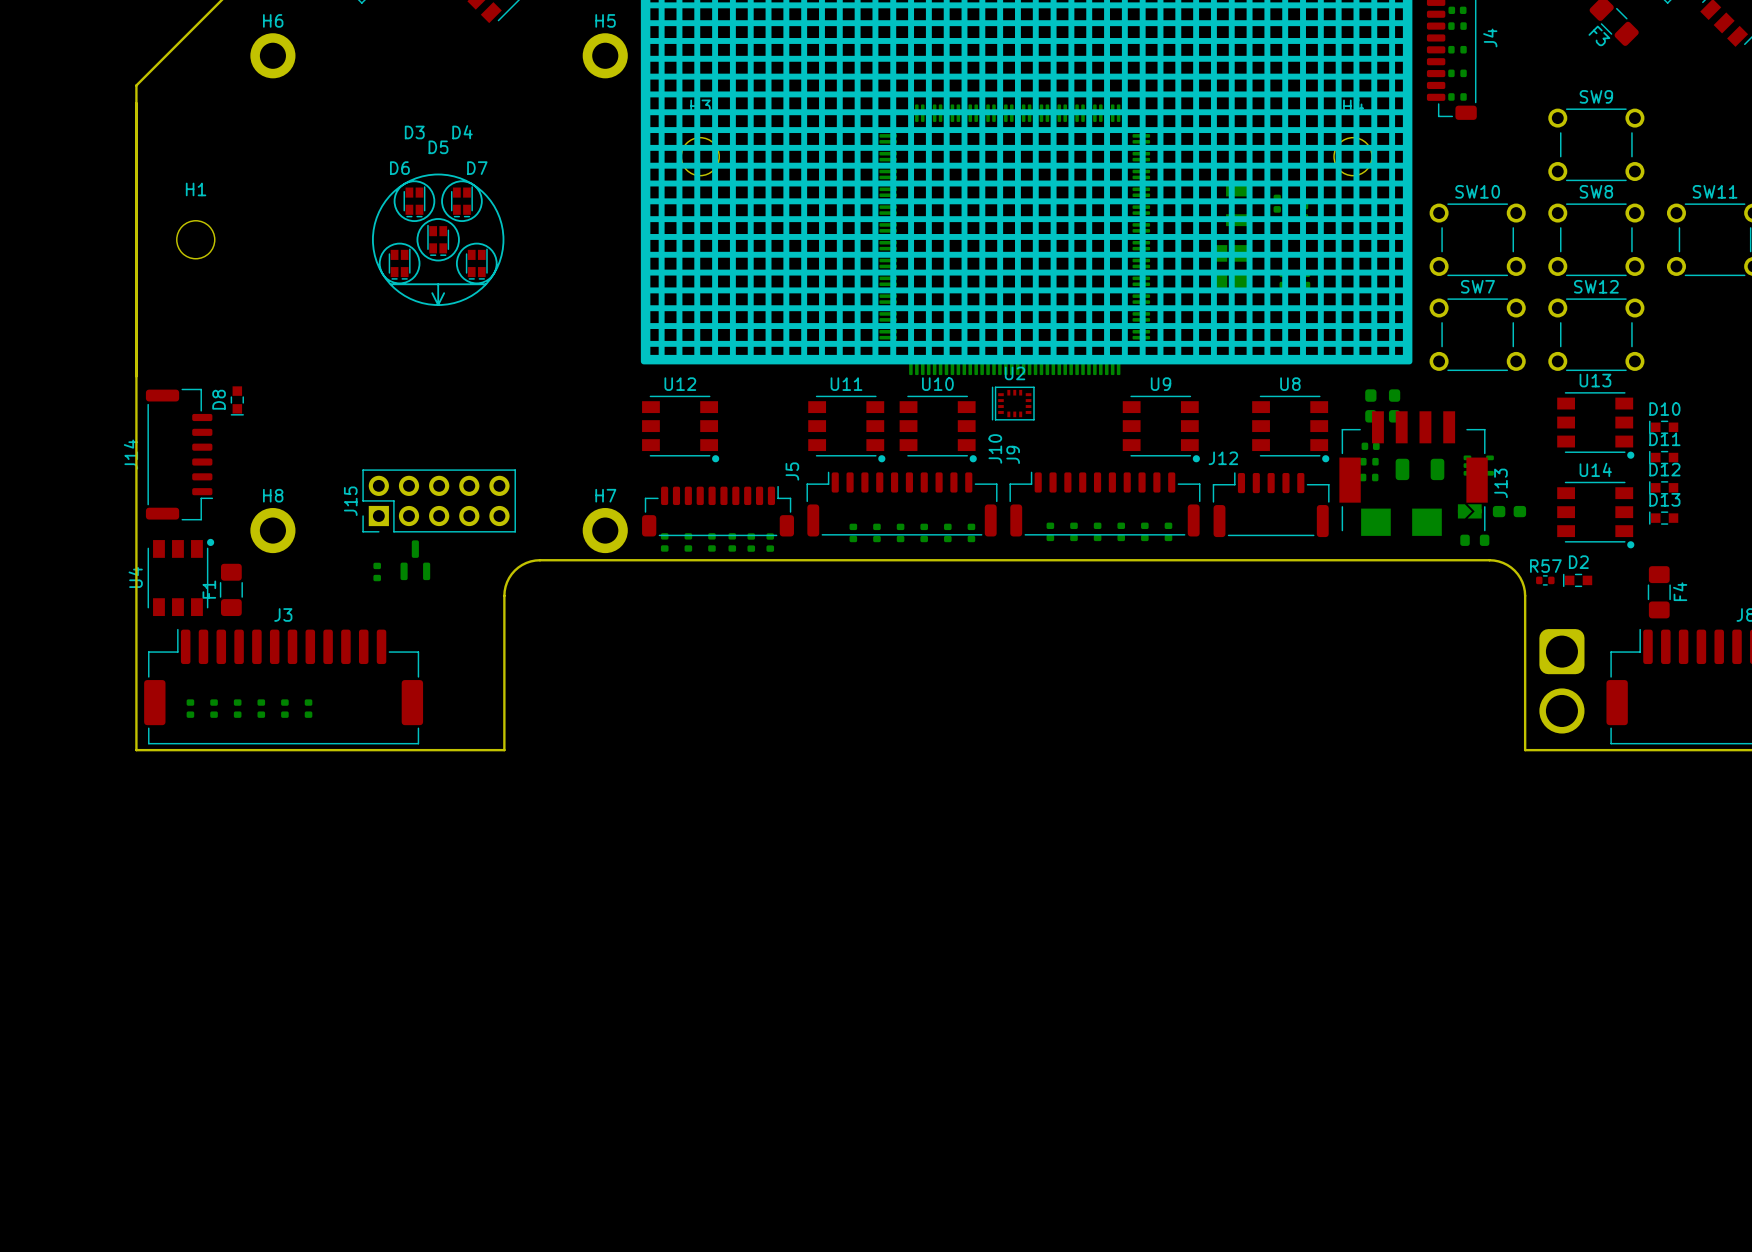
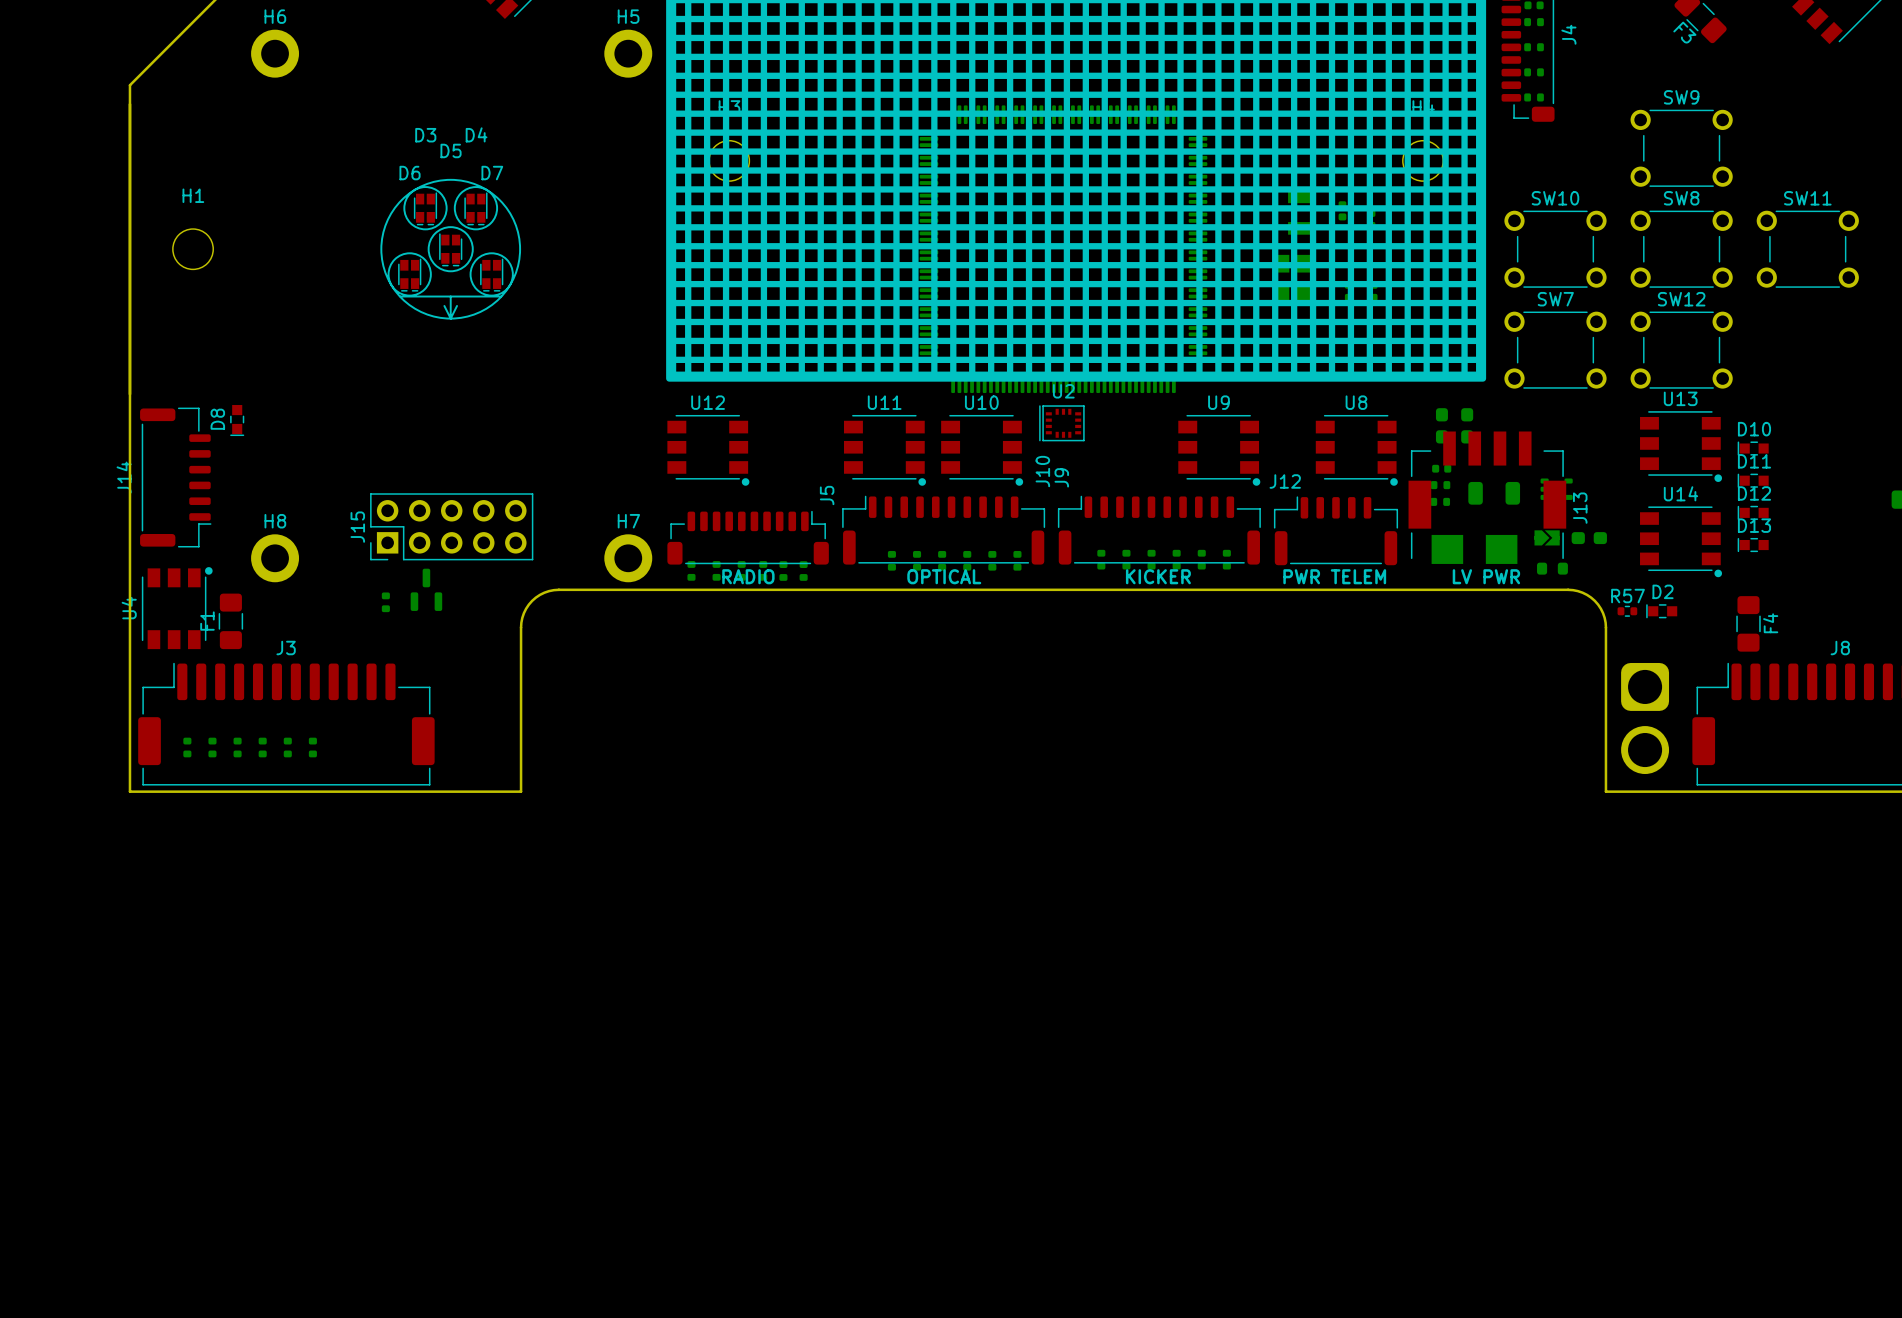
text: none -> RADIO (748, 576)
text: none -> OPTICAL (944, 576)
text: none -> KICKER (1158, 576)
text: none -> PWR TELEM (1334, 576)
text: none -> LV PWR (1486, 576)

